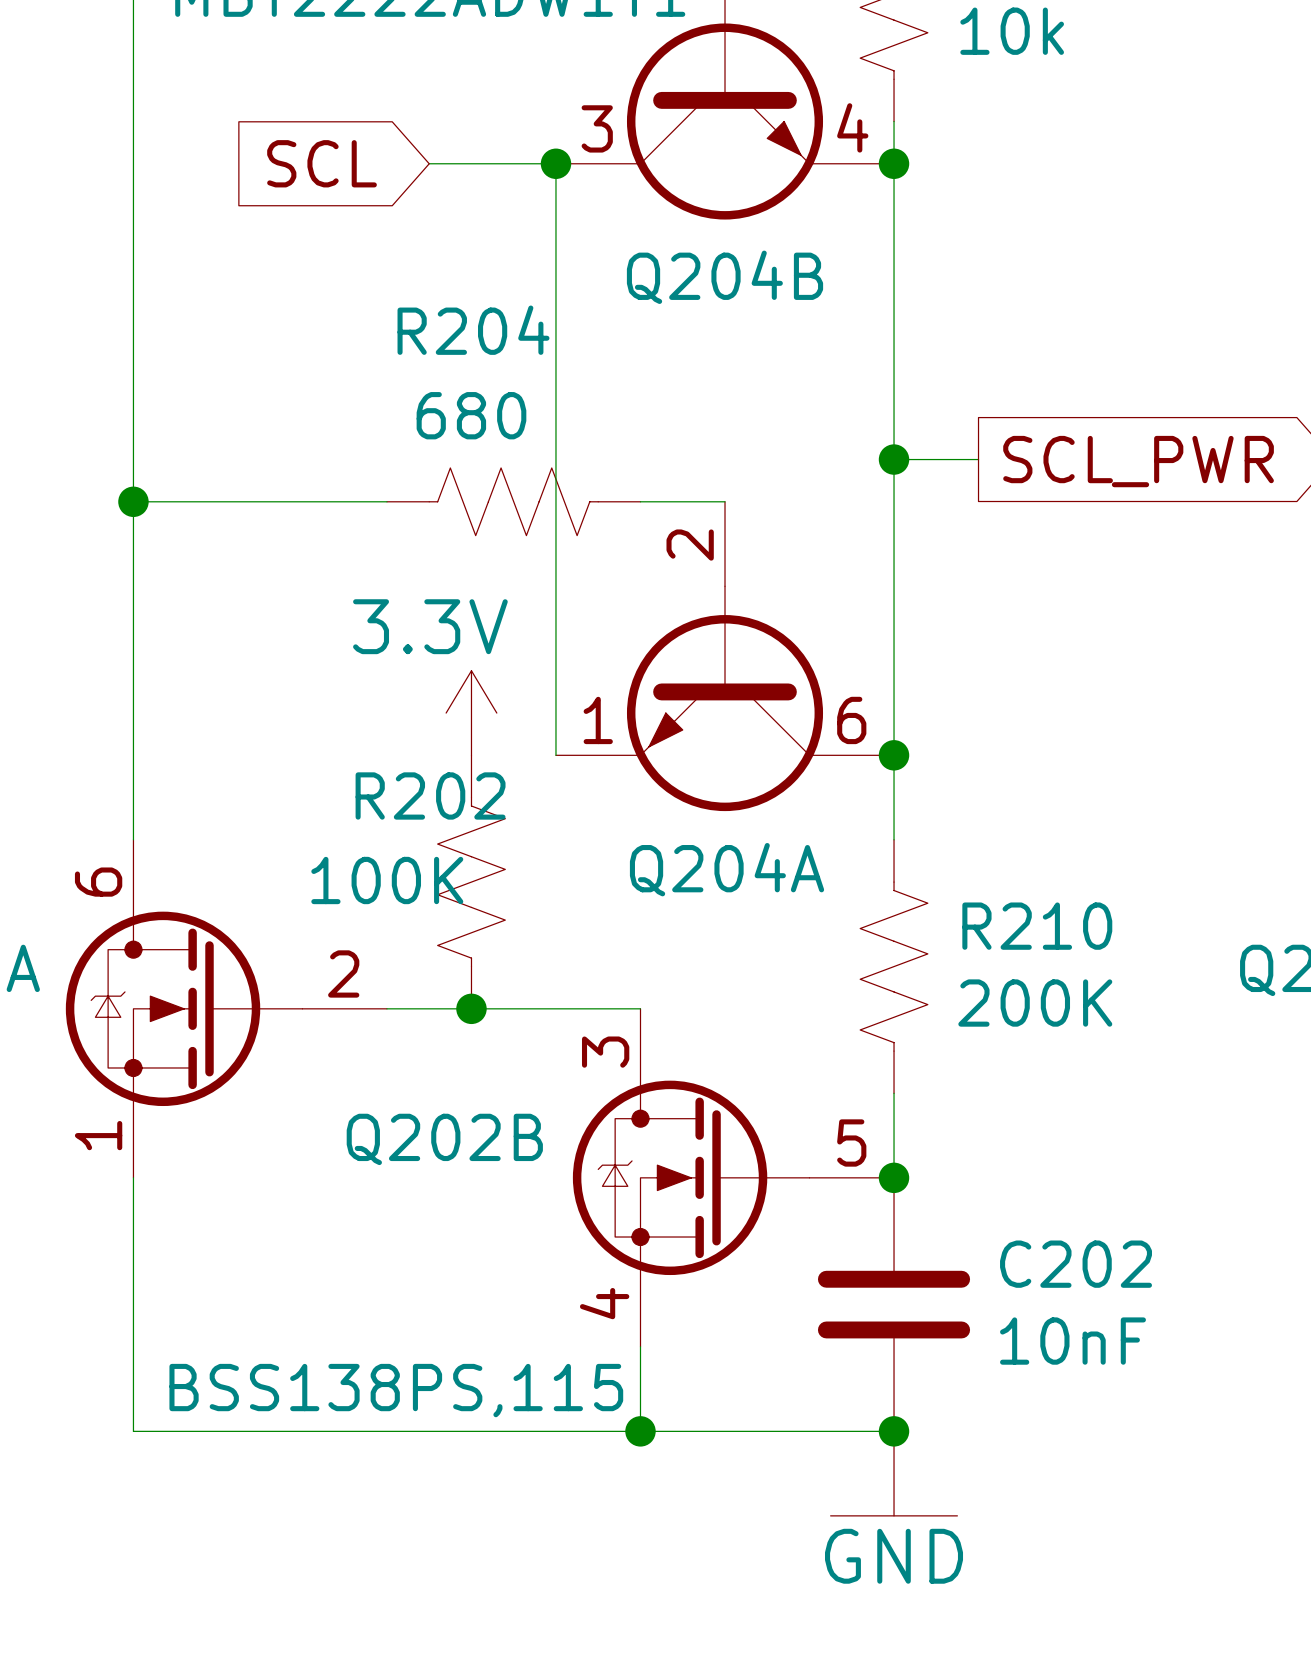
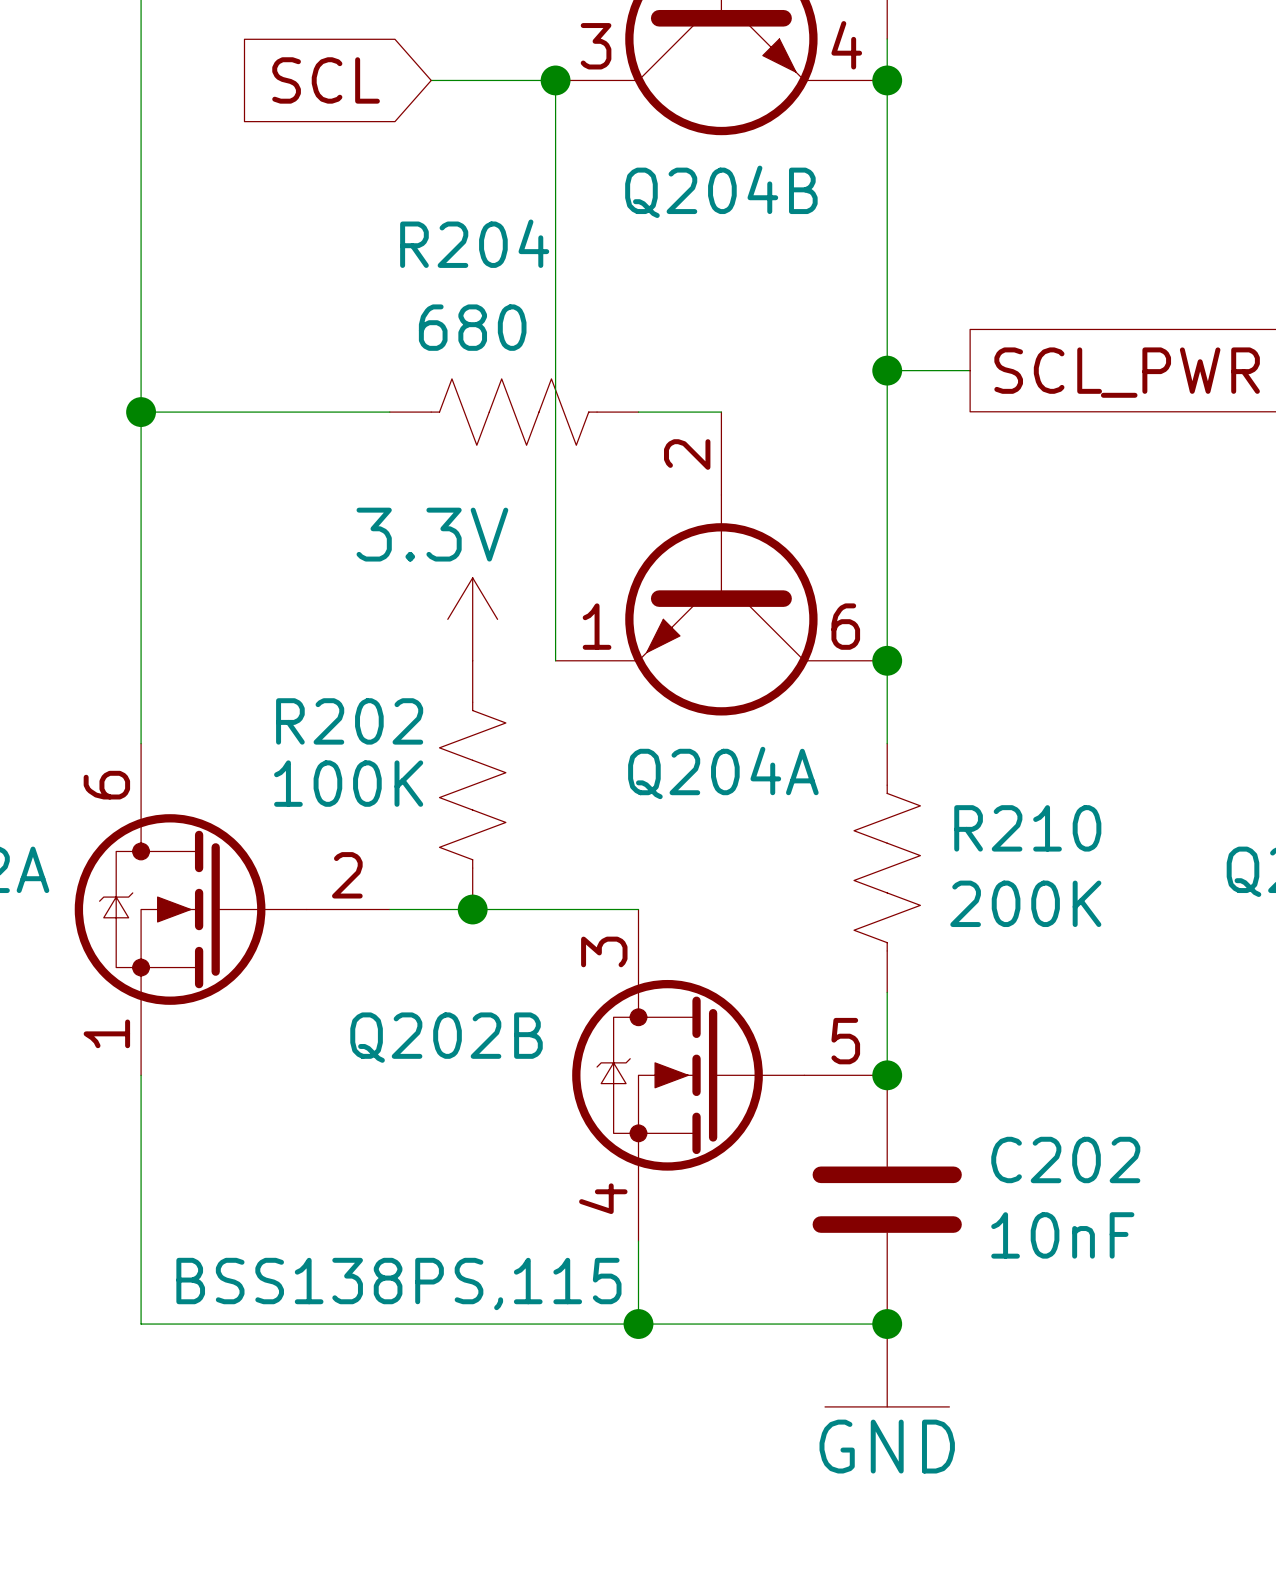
R202 name position: R202 (430, 795) -> R202 (349, 721)
R202 value position: 100K (387, 880) -> 100K (348, 783)

